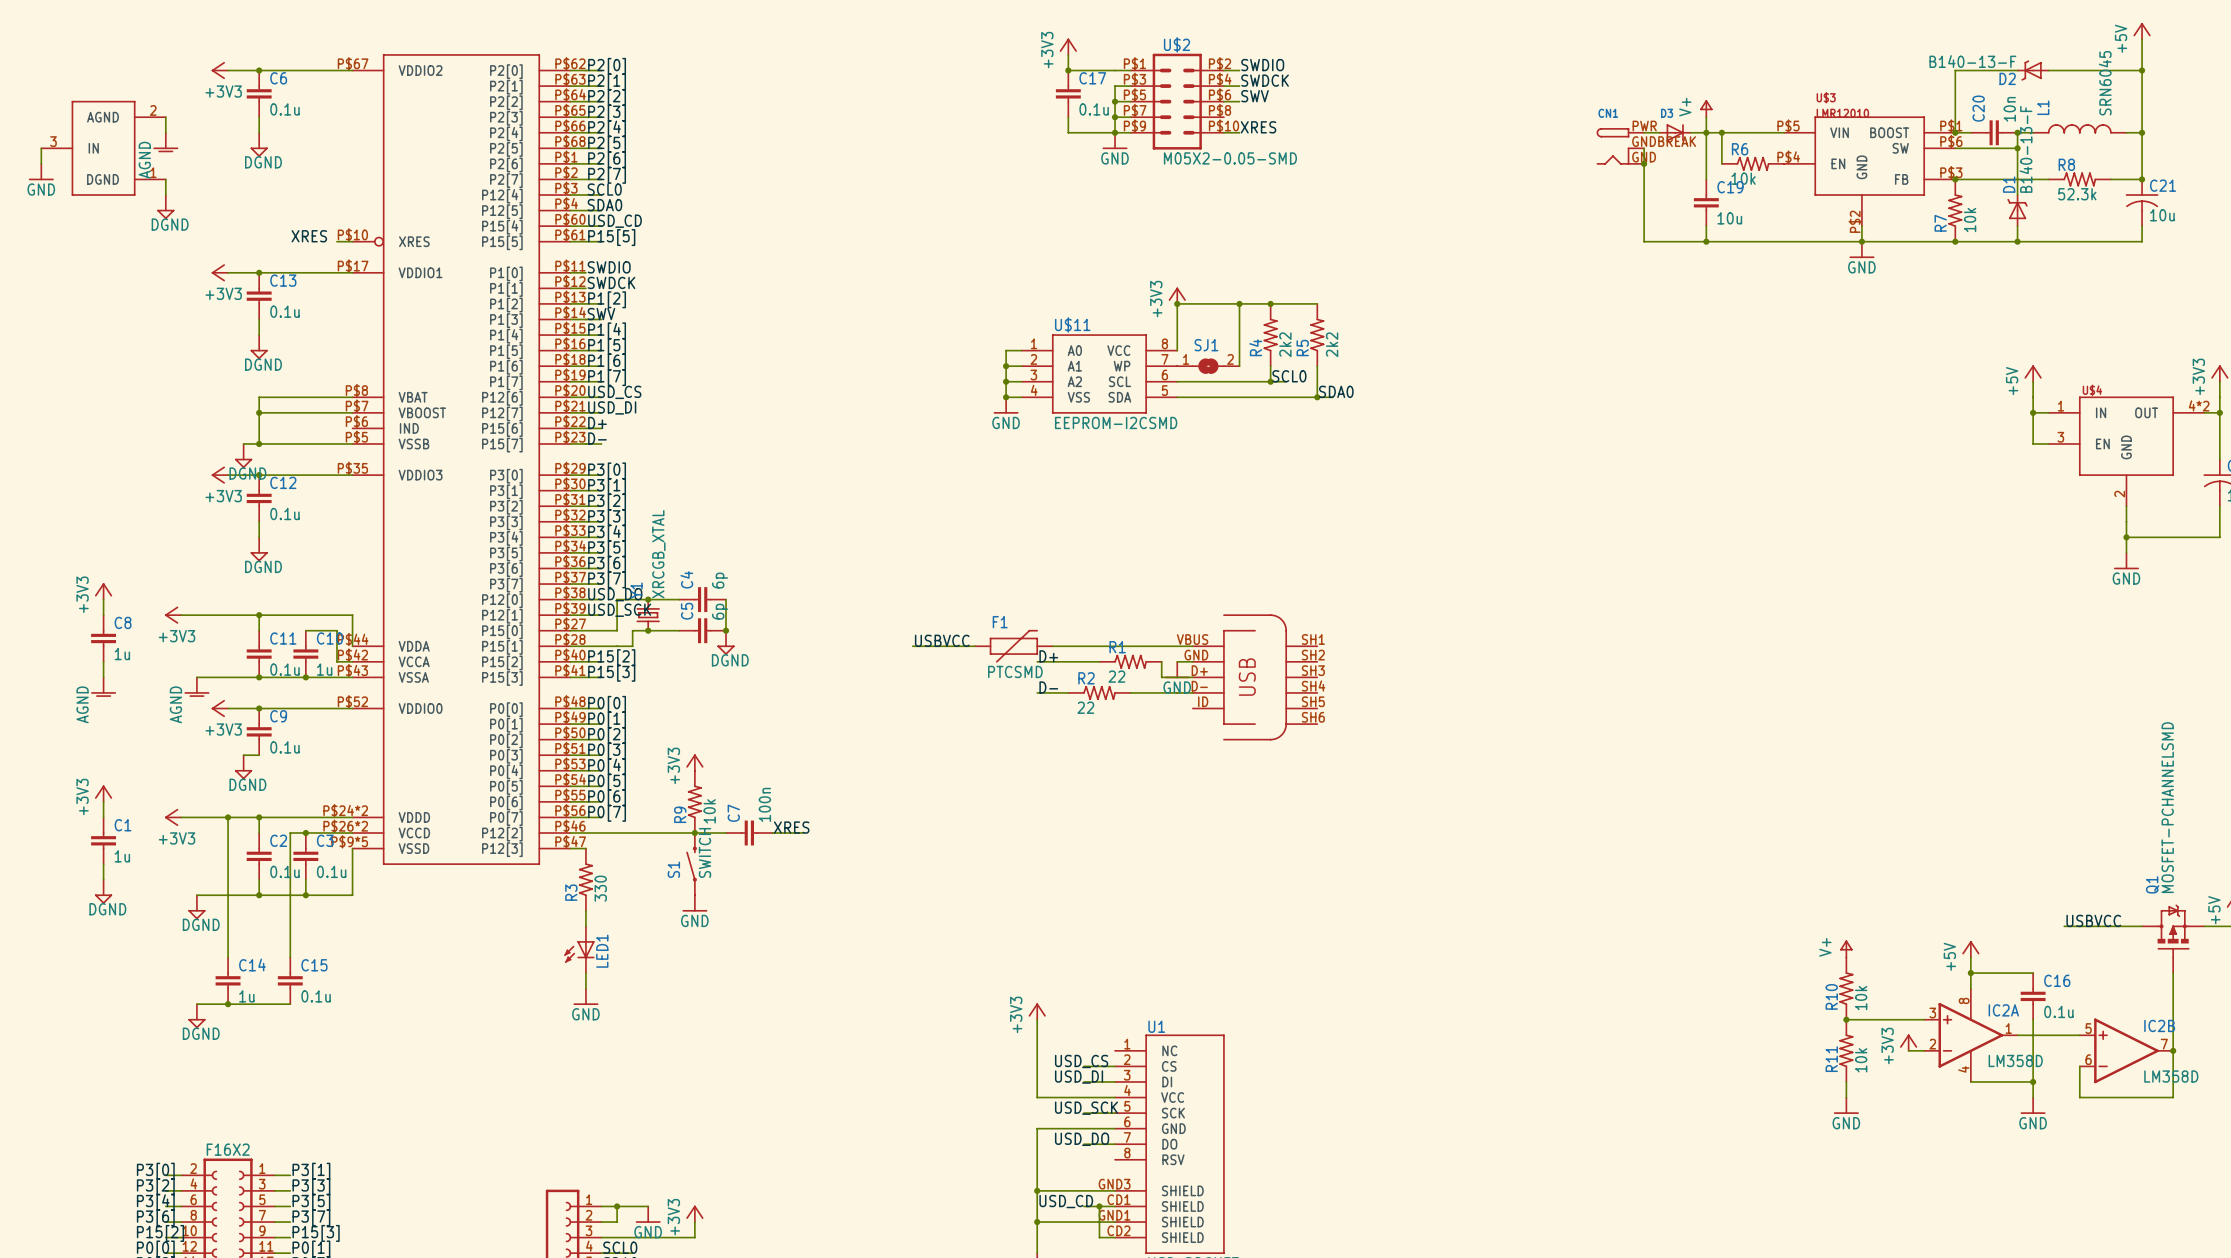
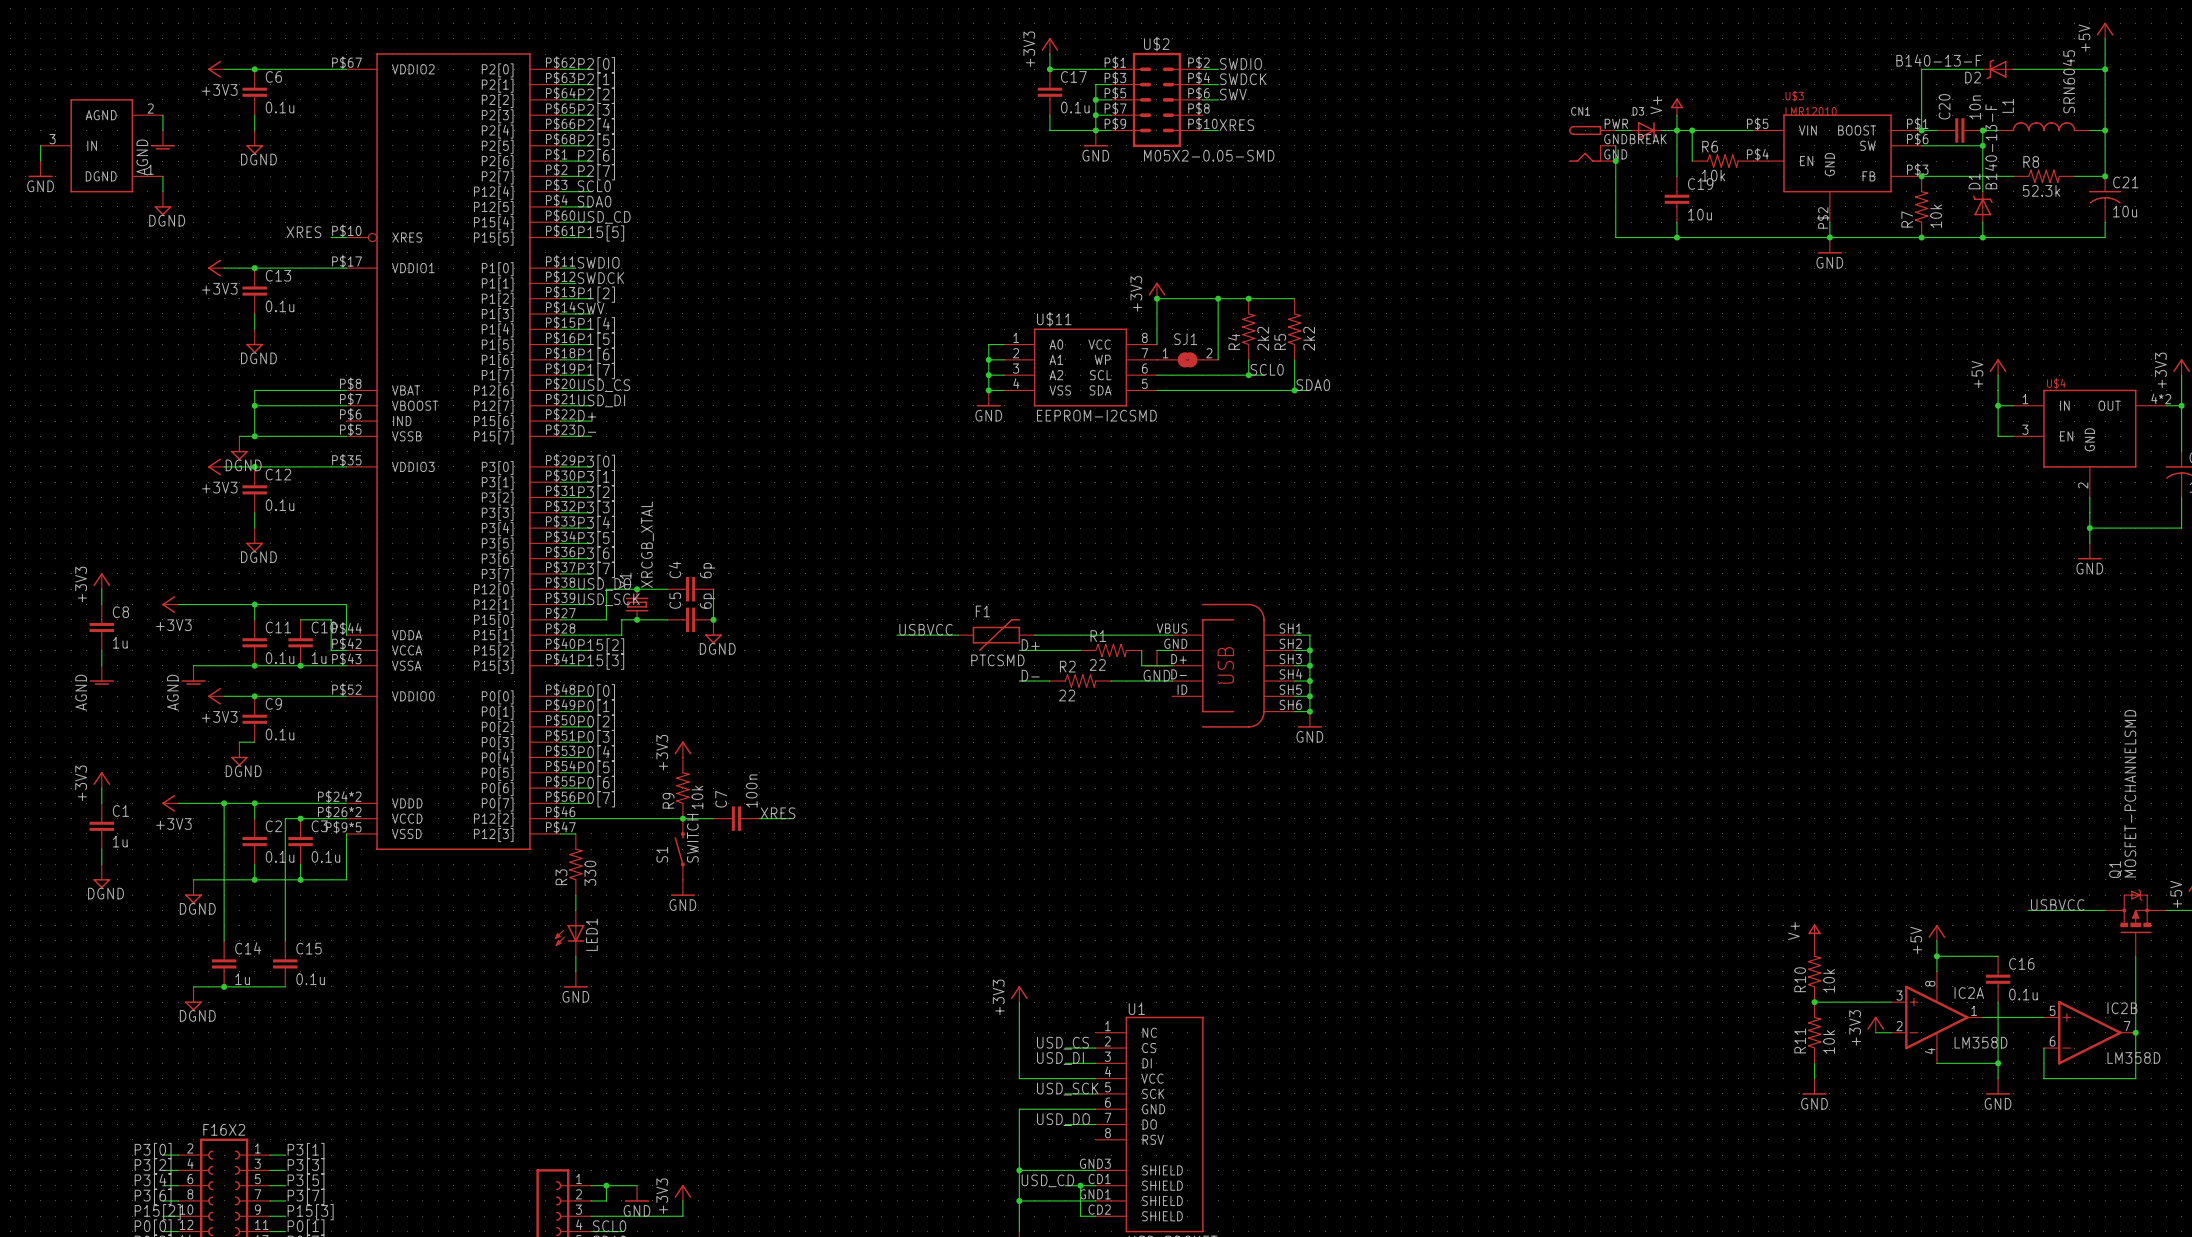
wire: none -> (1294, 635) (1309, 635) (1309, 711) (1294, 711)
wire: none -> (1294, 650) (1309, 650)
junction: none -> (1309, 650)
wire: none -> (1294, 665) (1309, 665)
junction: none -> (1309, 665)
wire: none -> (1294, 681) (1309, 681)
junction: none -> (1309, 681)
wire: none -> (1294, 696) (1309, 696)
junction: none -> (1309, 696)
junction: none -> (1309, 711)
power symbol: none -> GND (1309, 719)

